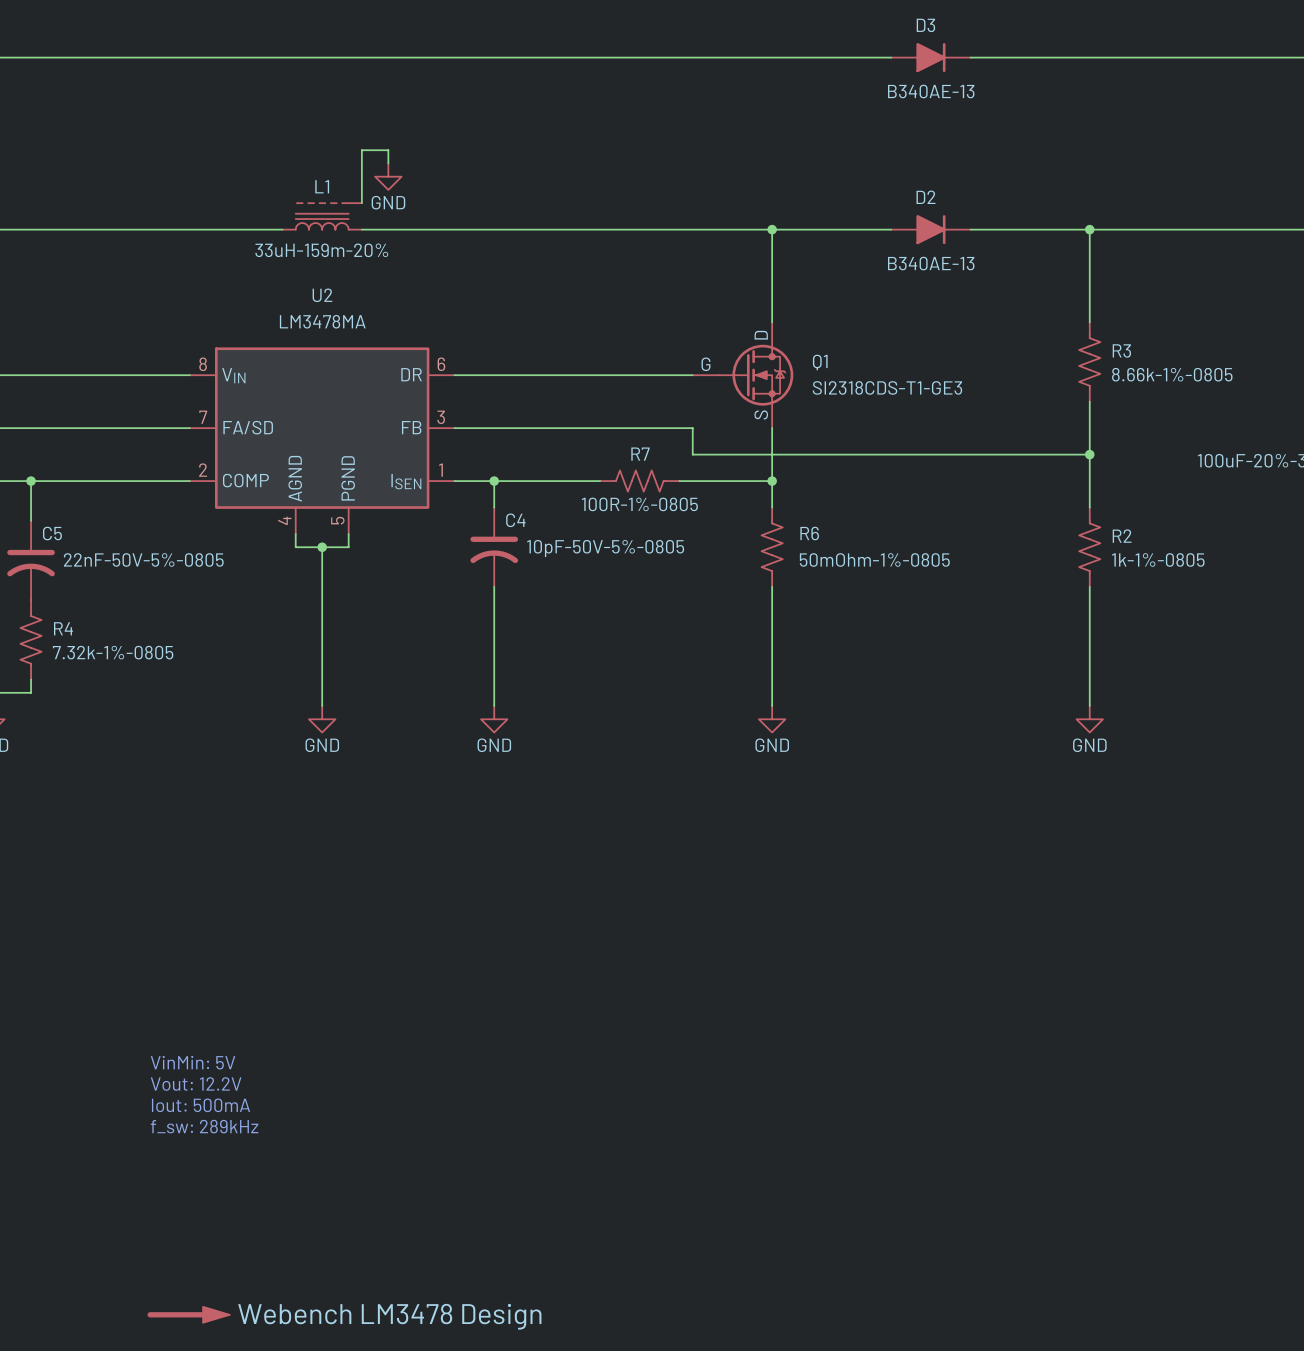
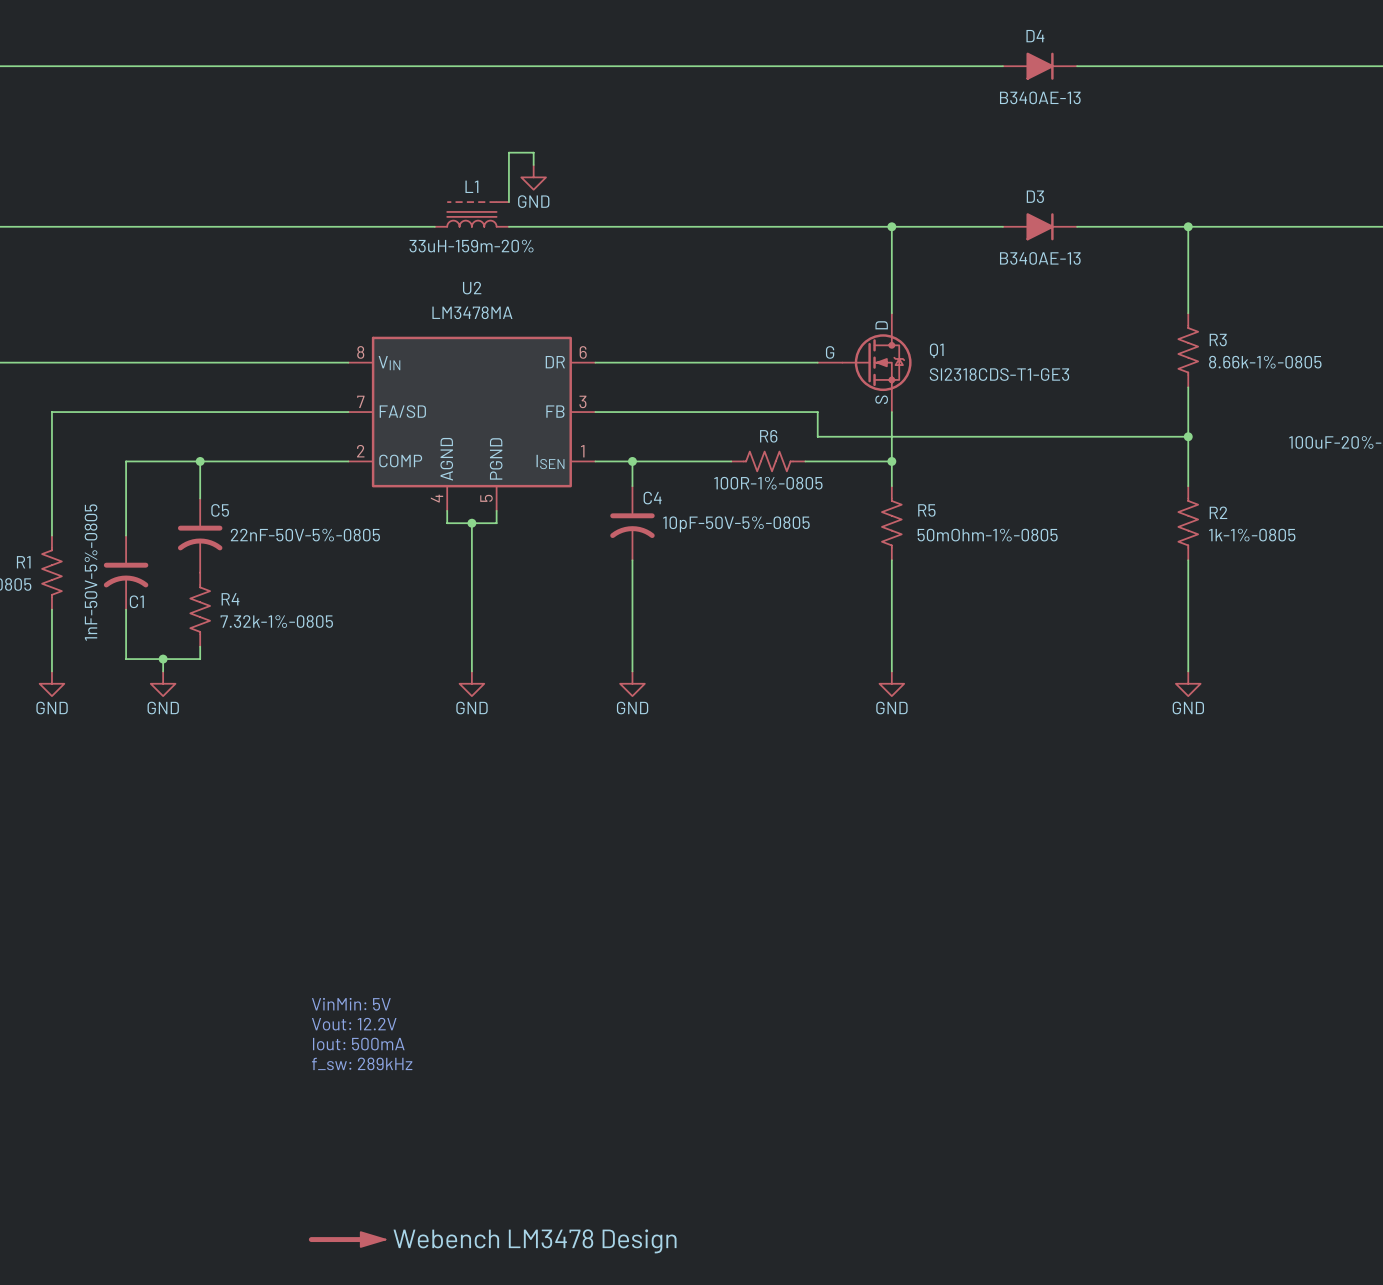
D3 name: D3 (925, 25) -> D4 (1035, 36)
D2 name: D2 (925, 197) -> D3 (1035, 196)
R7 name: R7 (640, 454) -> R6 (768, 436)
R6 name: R6 (809, 533) -> R5 (926, 510)

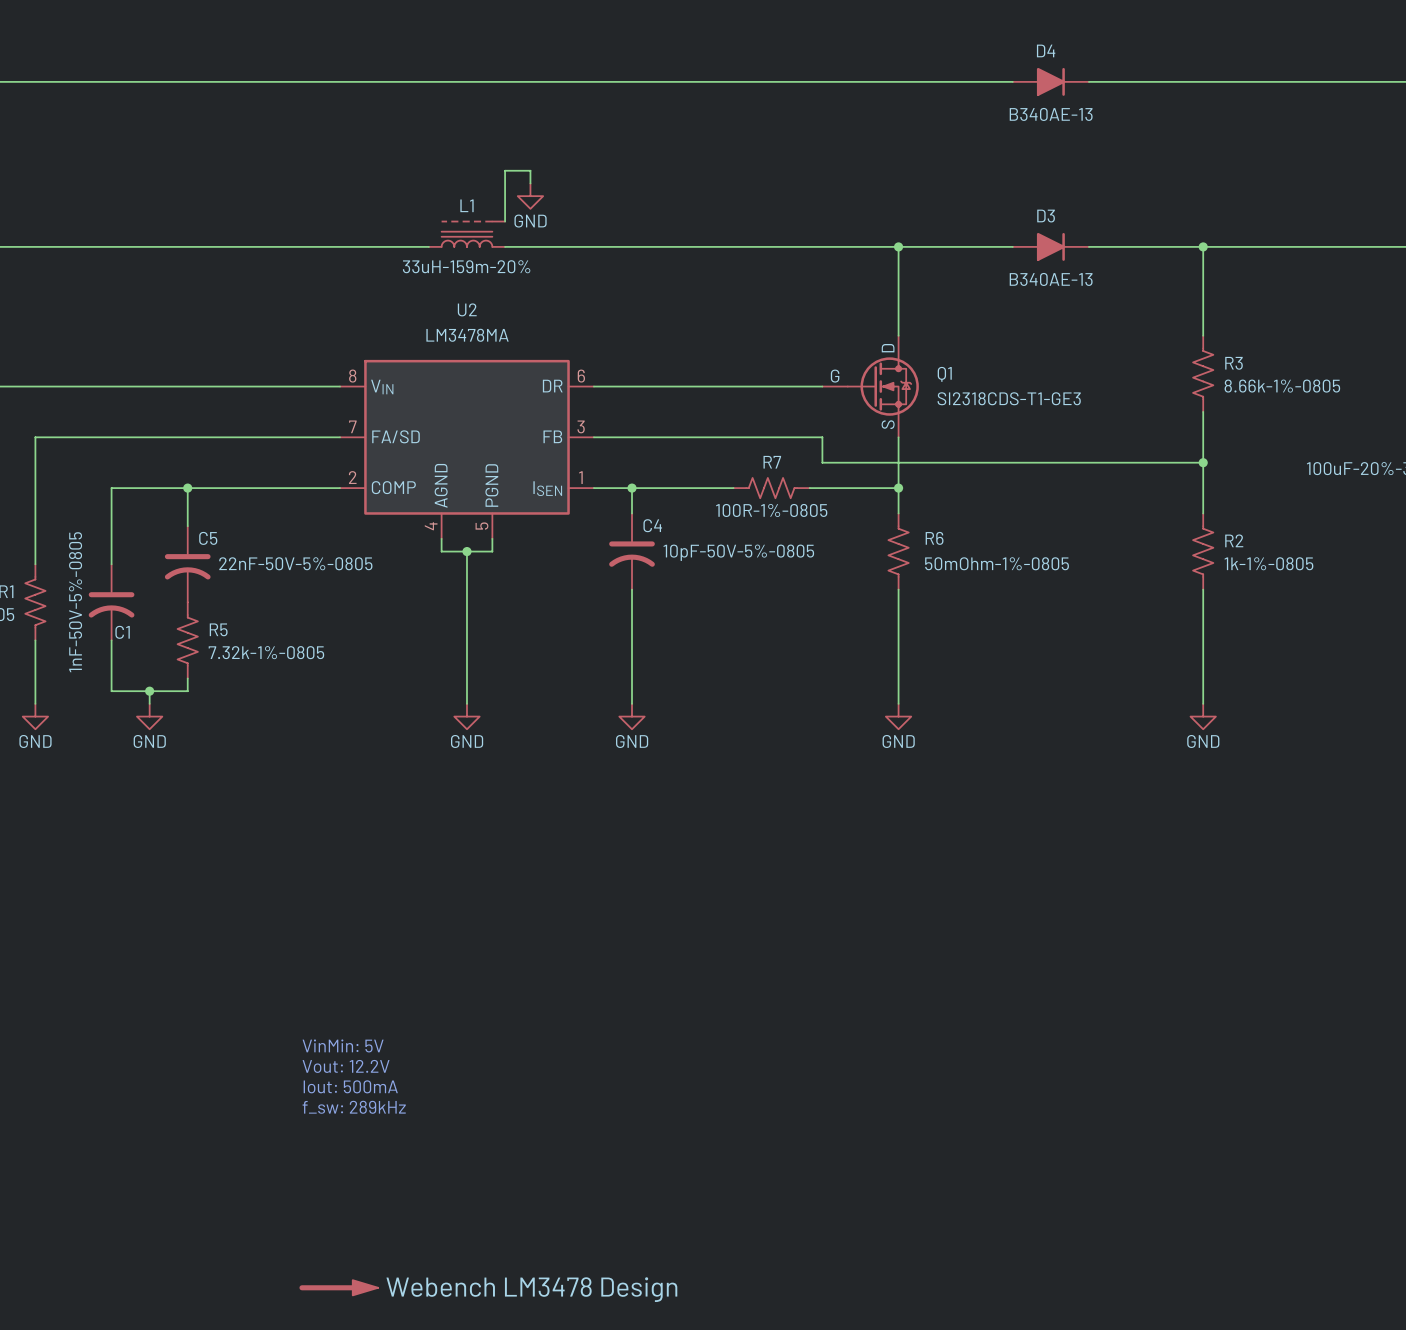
R6 name: R6 (768, 436) -> R7 (772, 462)
R5 name: R5 (926, 510) -> R6 (934, 538)
R4 name: R4 (230, 599) -> R5 (218, 629)

